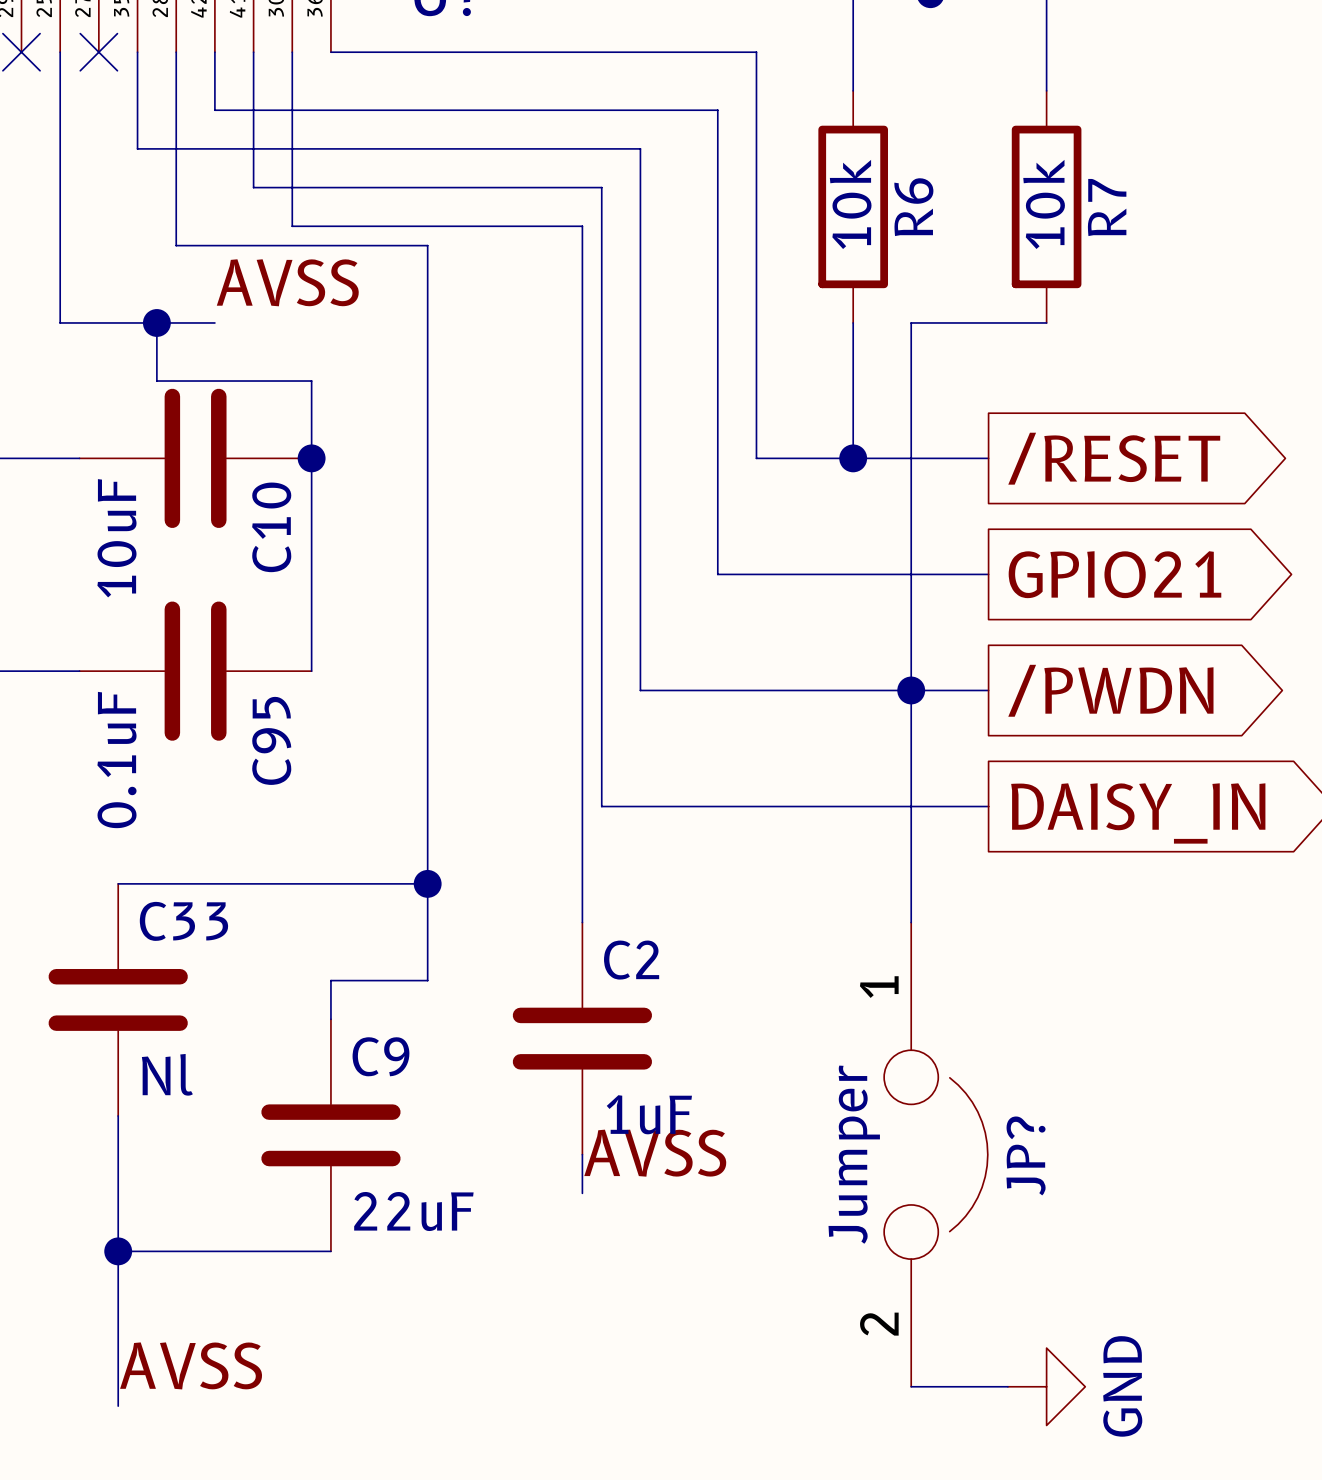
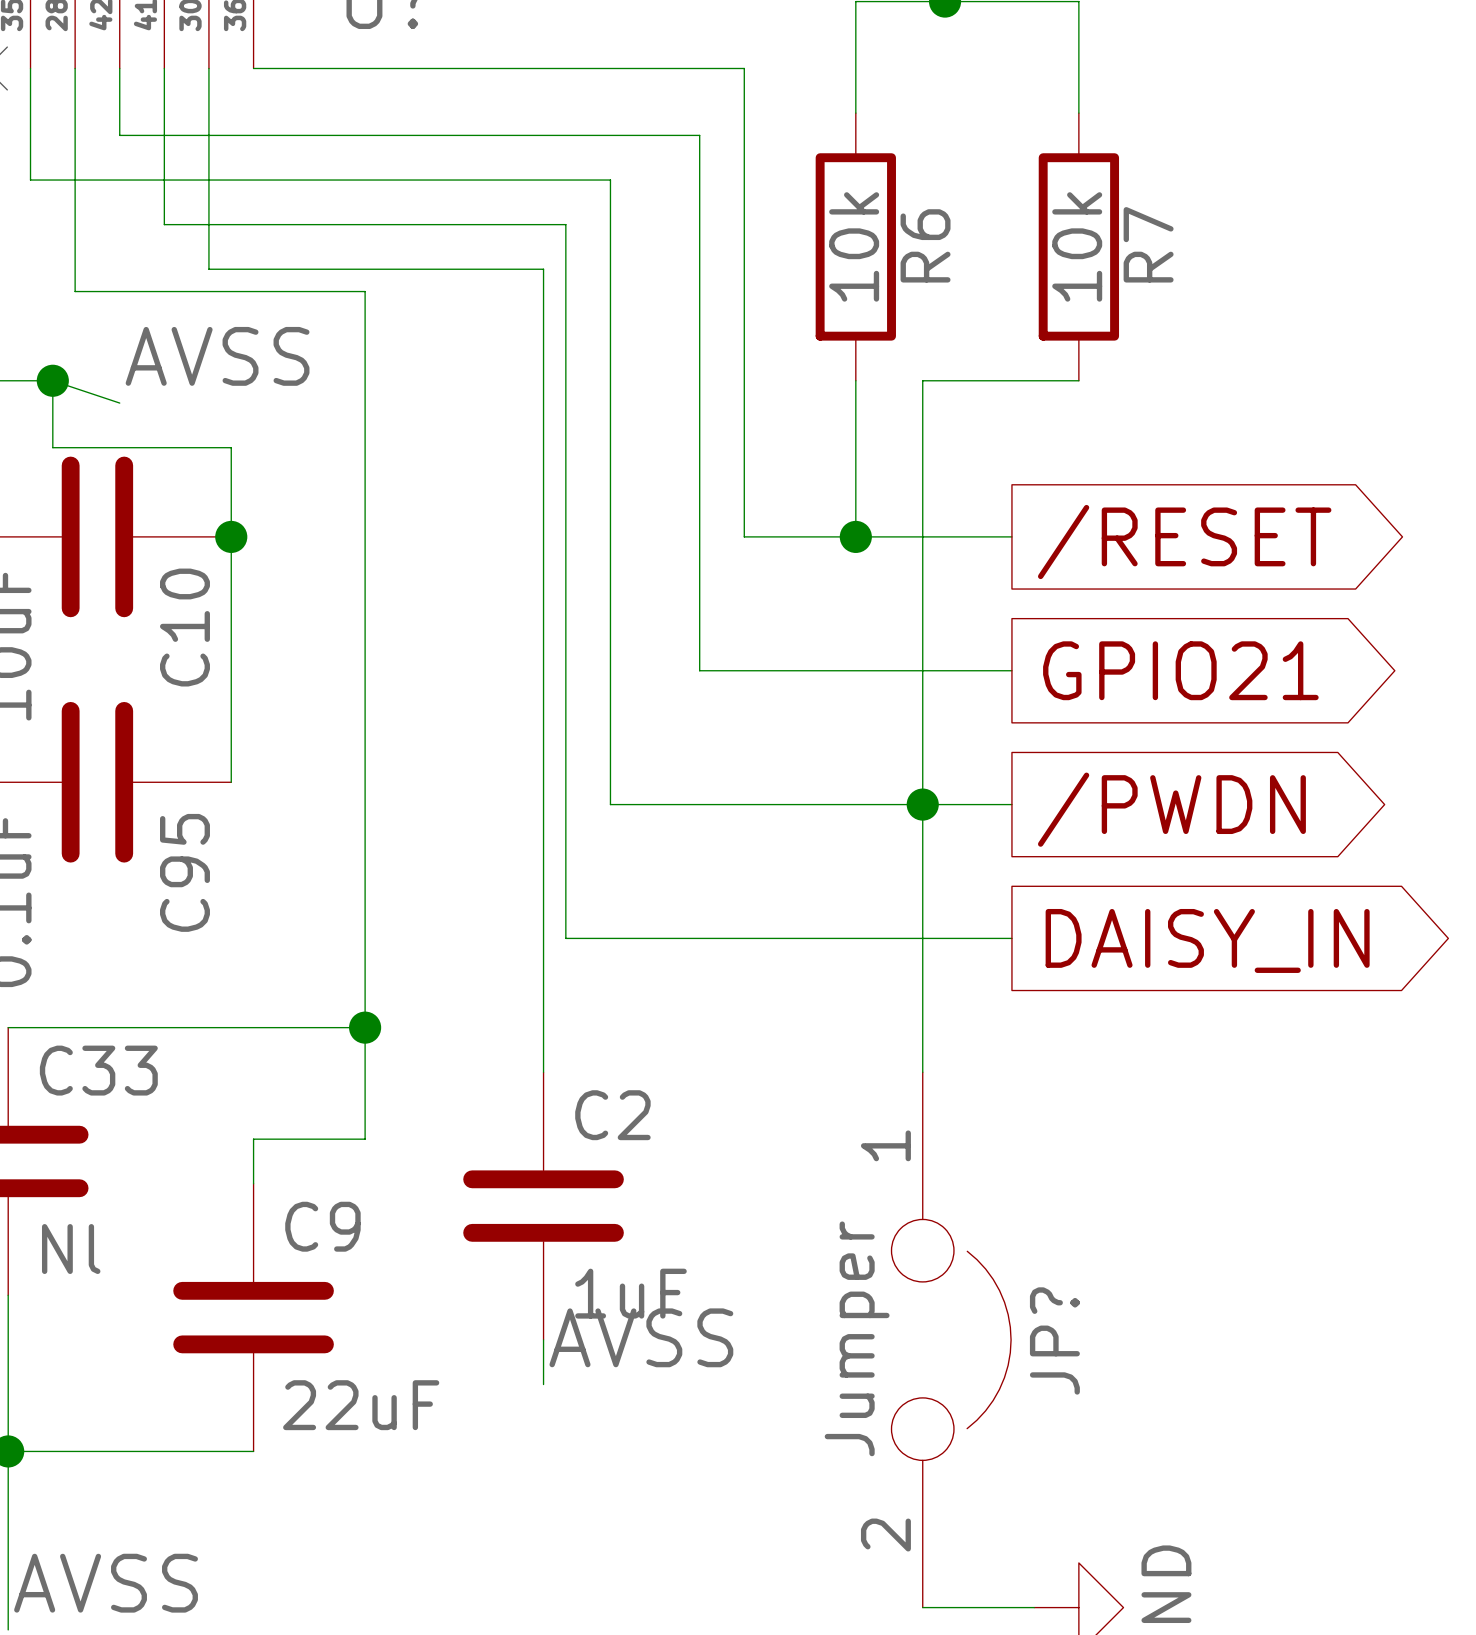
label position: AVSS (287, 282) -> AVSS (217, 356)
wire: (156, 322) (214, 322) -> (52, 380) (119, 403)

